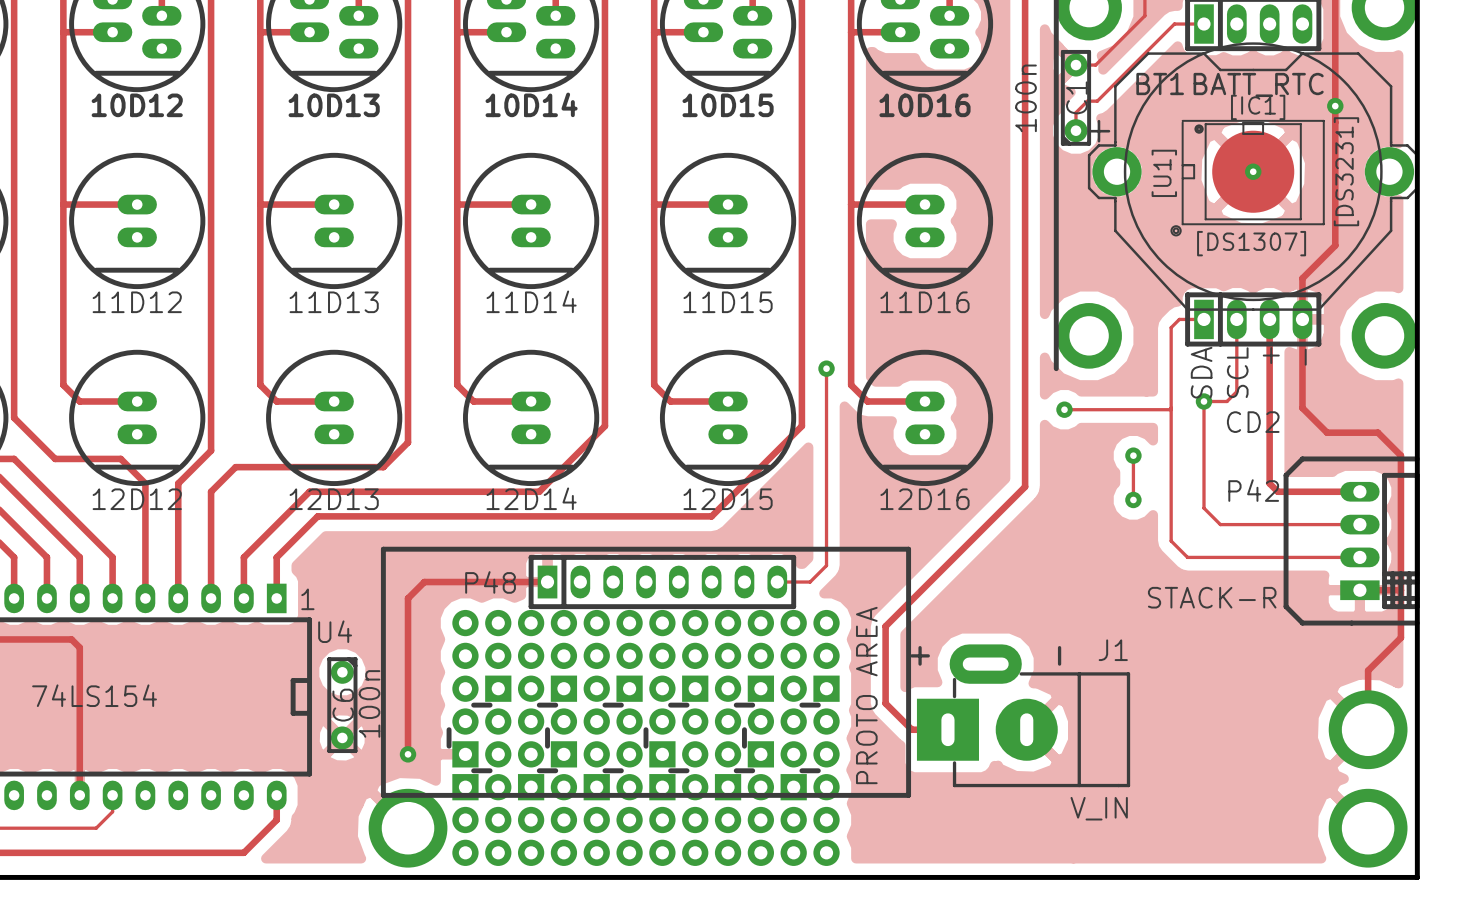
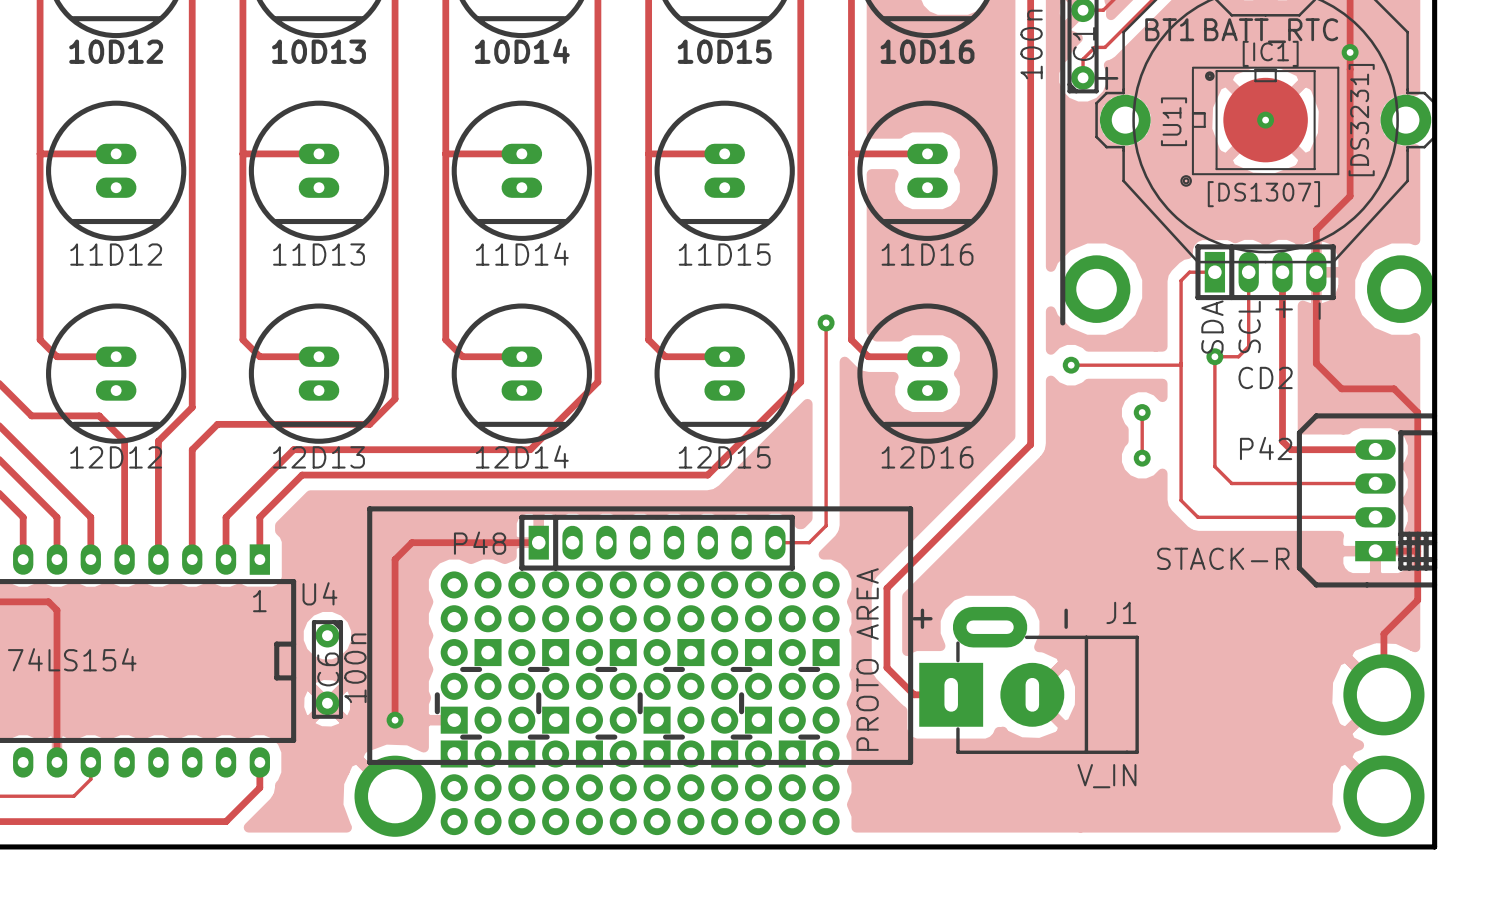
text position: 1 (307, 599) -> 1 (259, 601)

